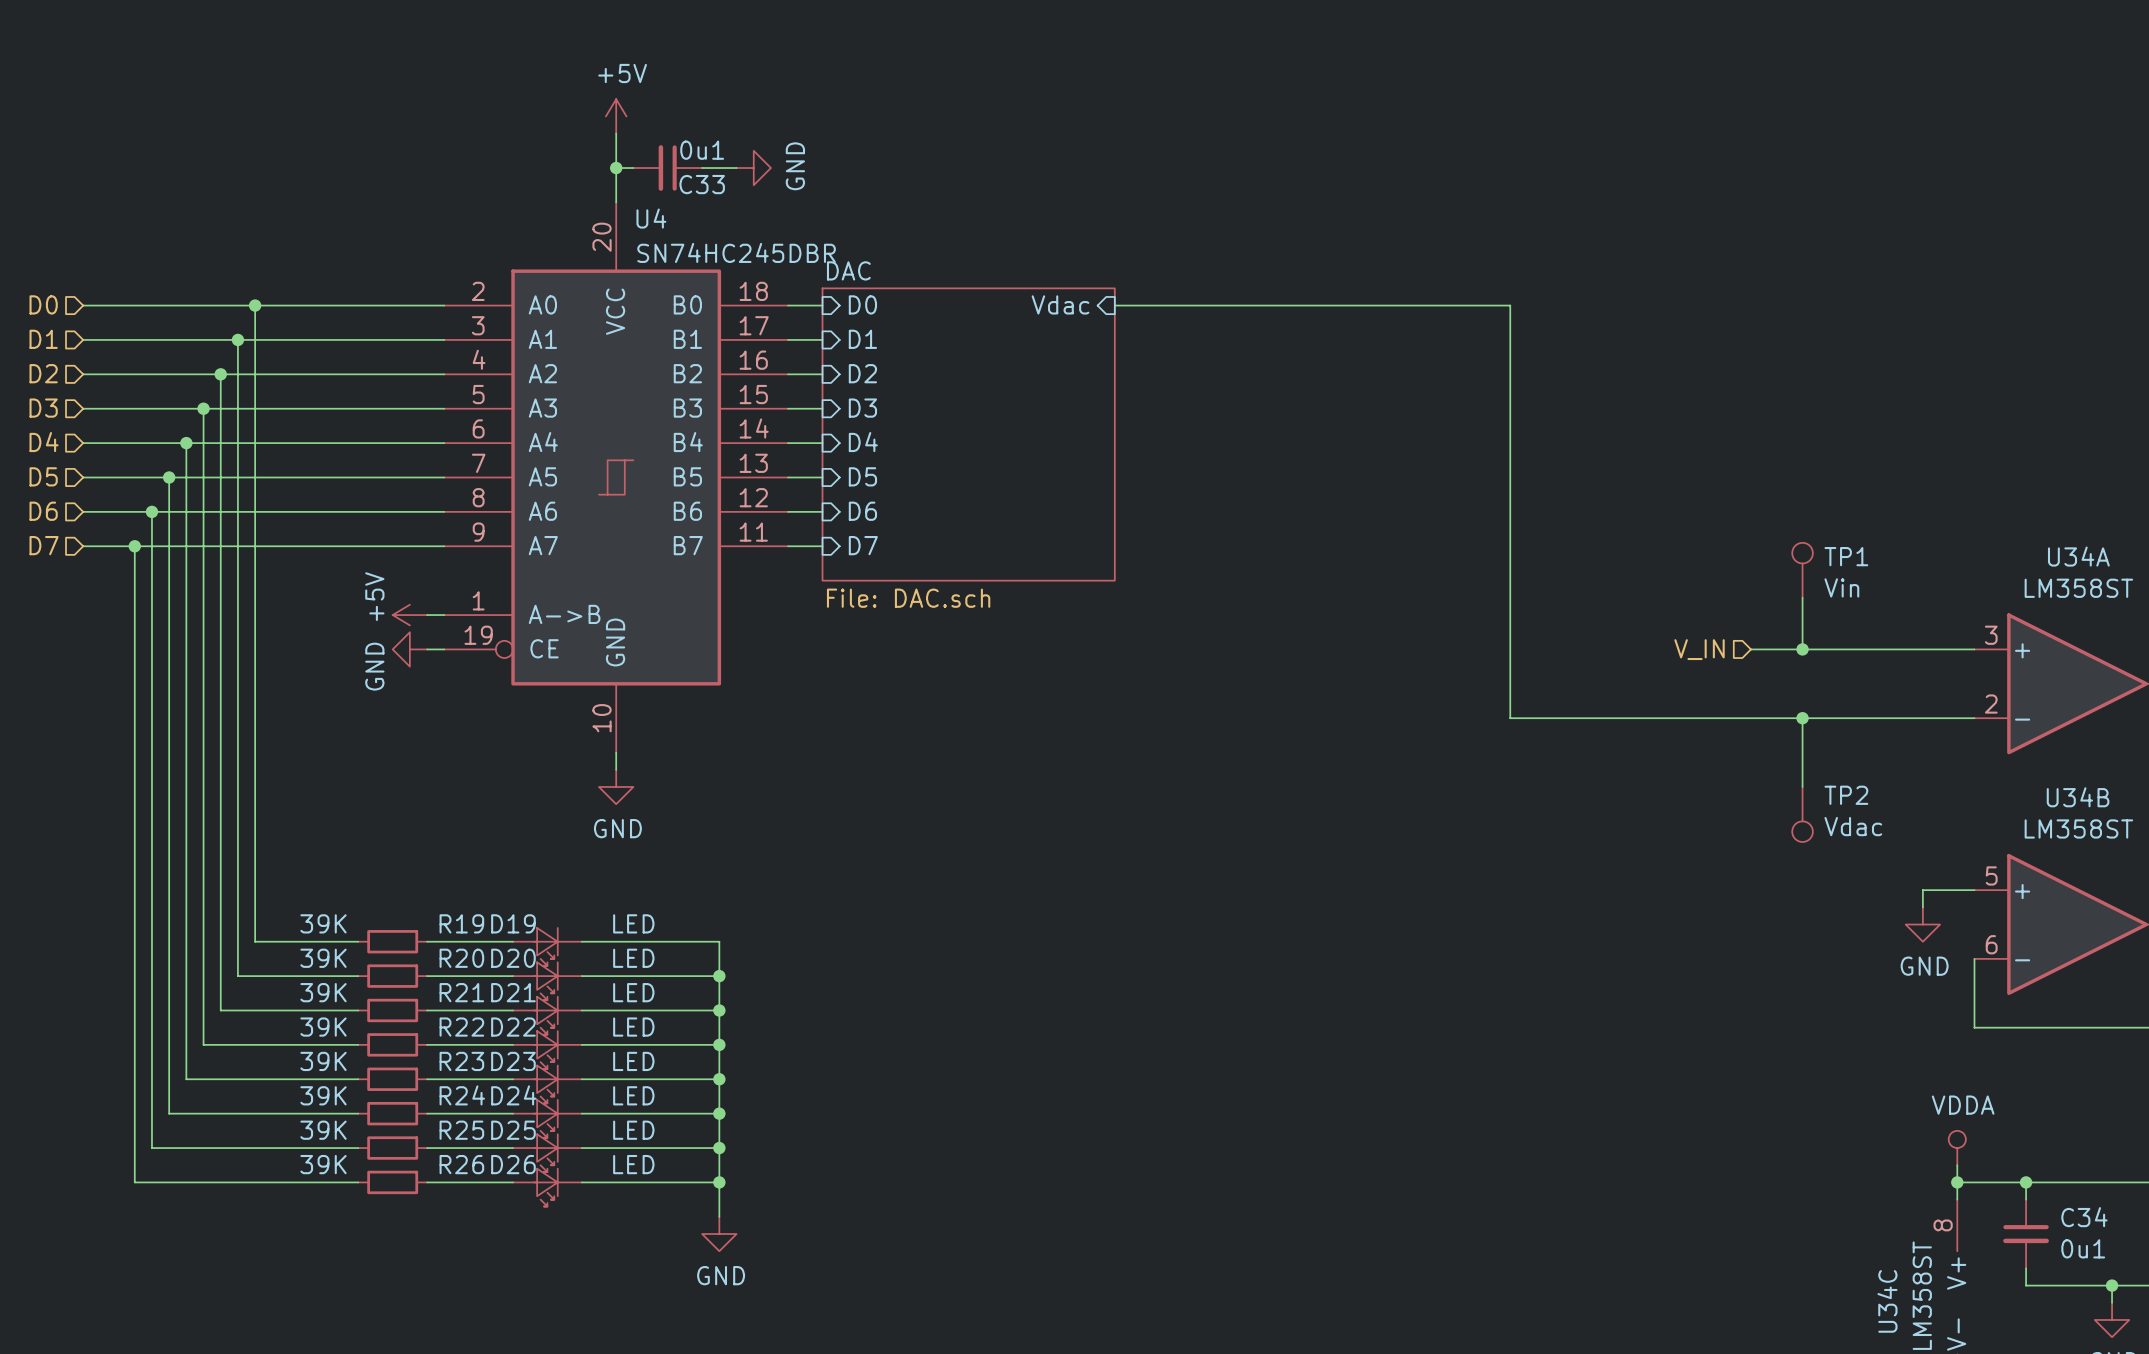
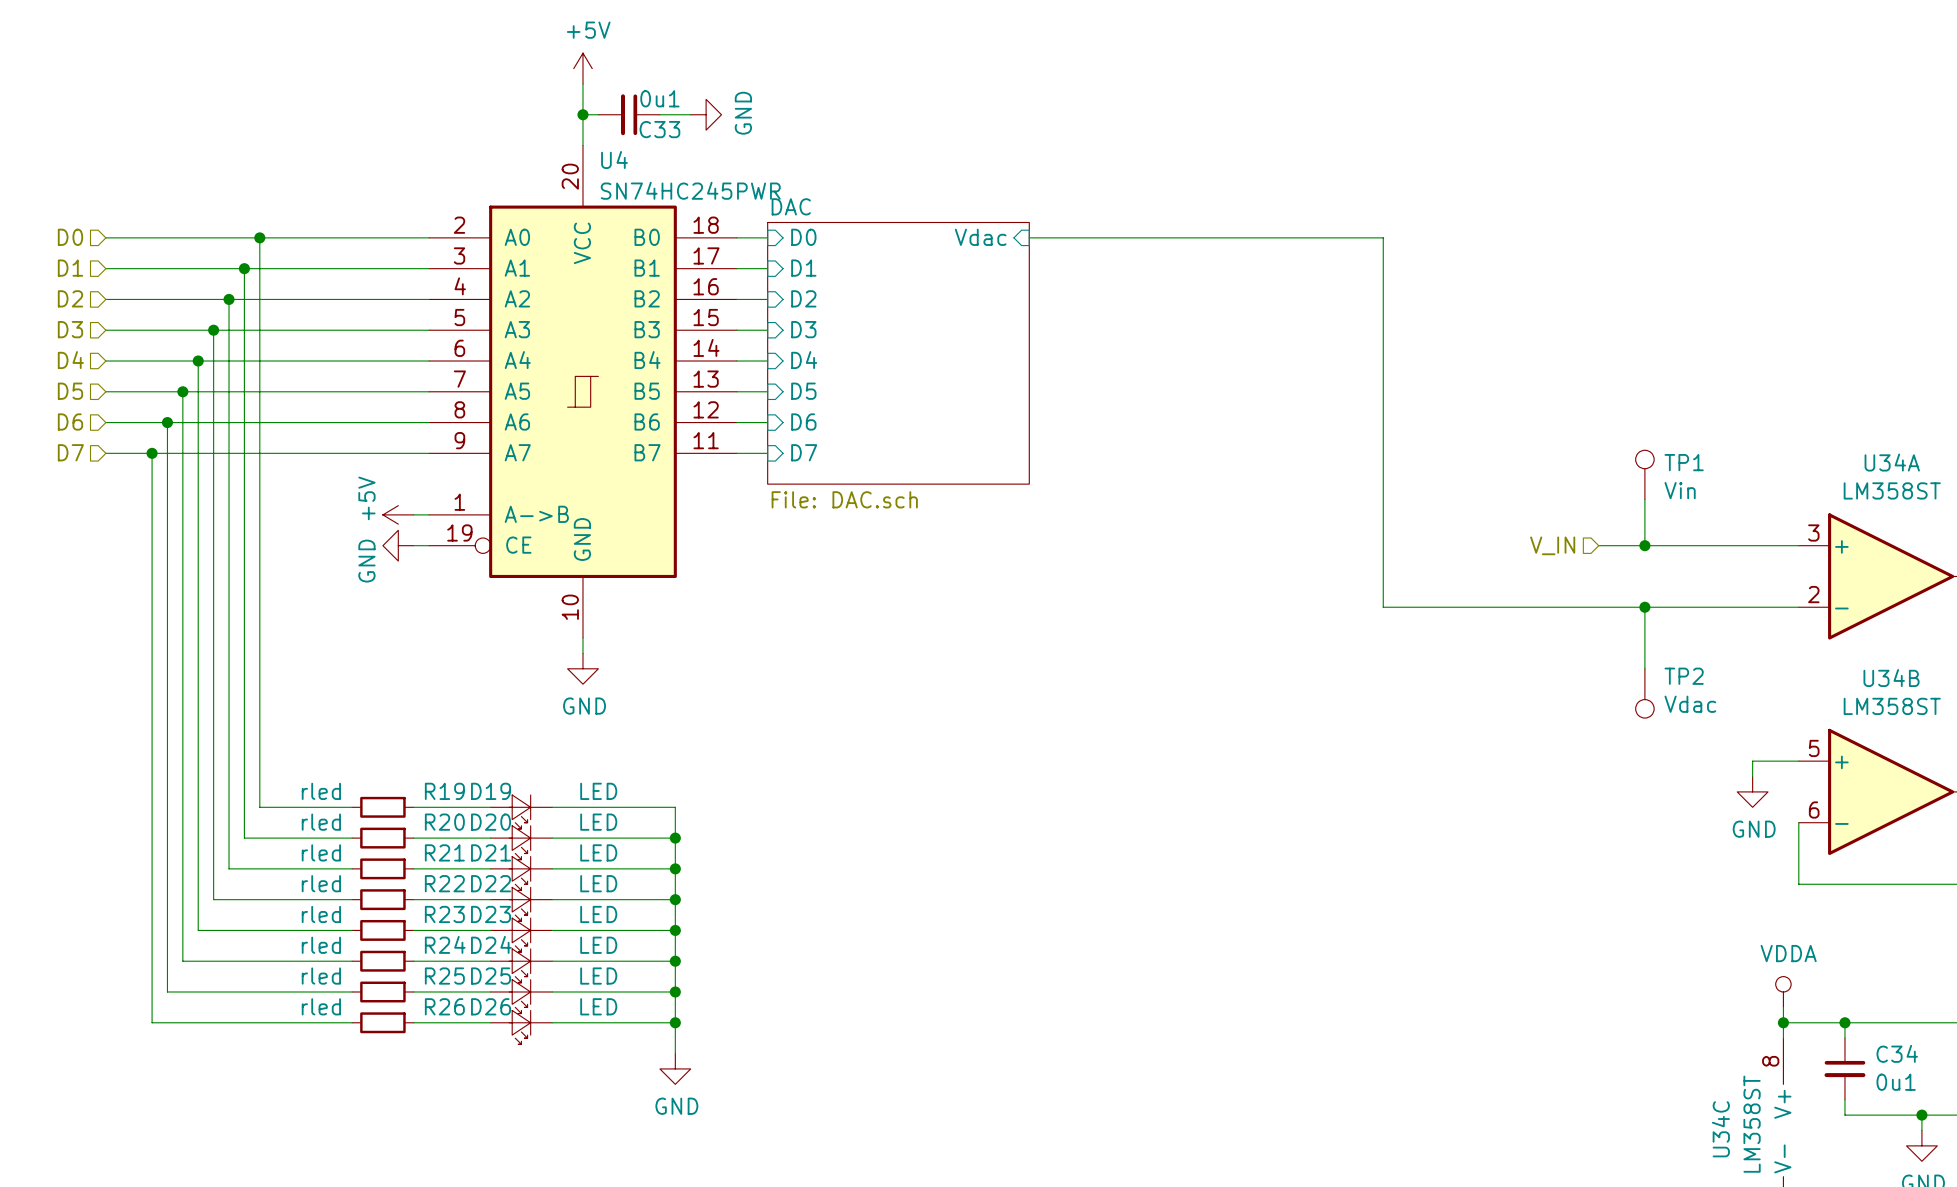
U4 value: SN74HC245DBR (736, 252) -> SN74HC245PWR (690, 190)
R19 value: 39K (323, 923) -> rled (321, 791)
R20 value: 39K (323, 958) -> rled (321, 822)
R21 value: 39K (323, 992) -> rled (321, 852)
R22 value: 39K (323, 1027) -> rled (321, 883)
R23 value: 39K (323, 1061) -> rled (321, 914)
R24 value: 39K (323, 1095) -> rled (321, 945)
R25 value: 39K (323, 1130) -> rled (321, 976)
R26 value: 39K (323, 1164) -> rled (321, 1006)

